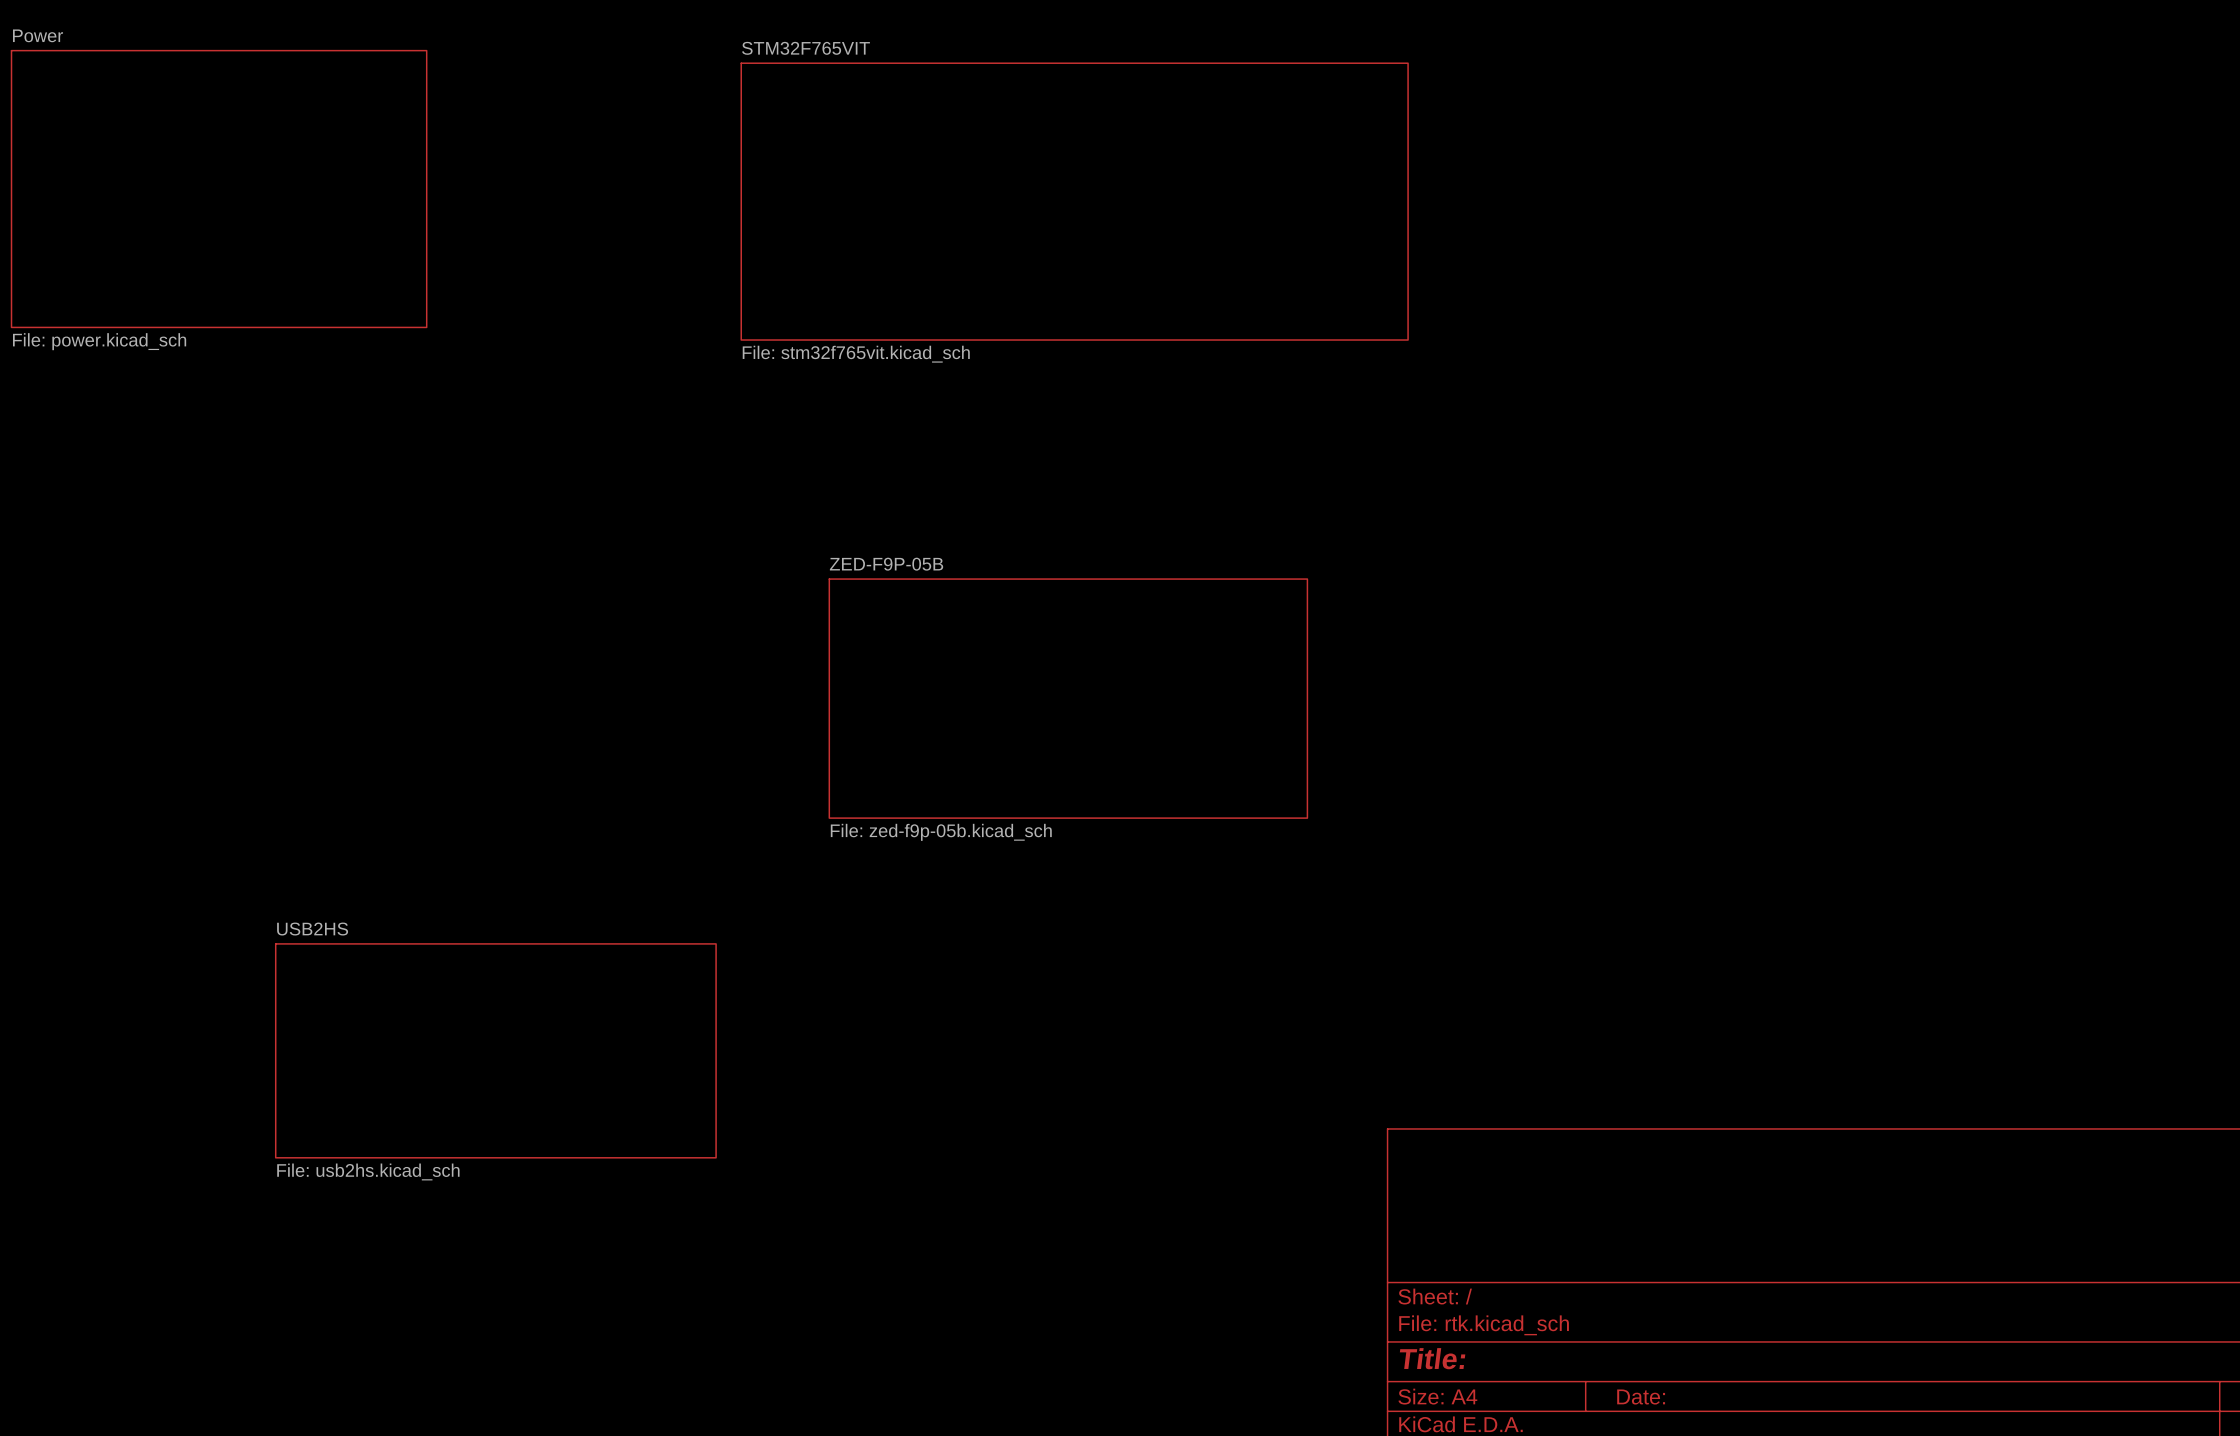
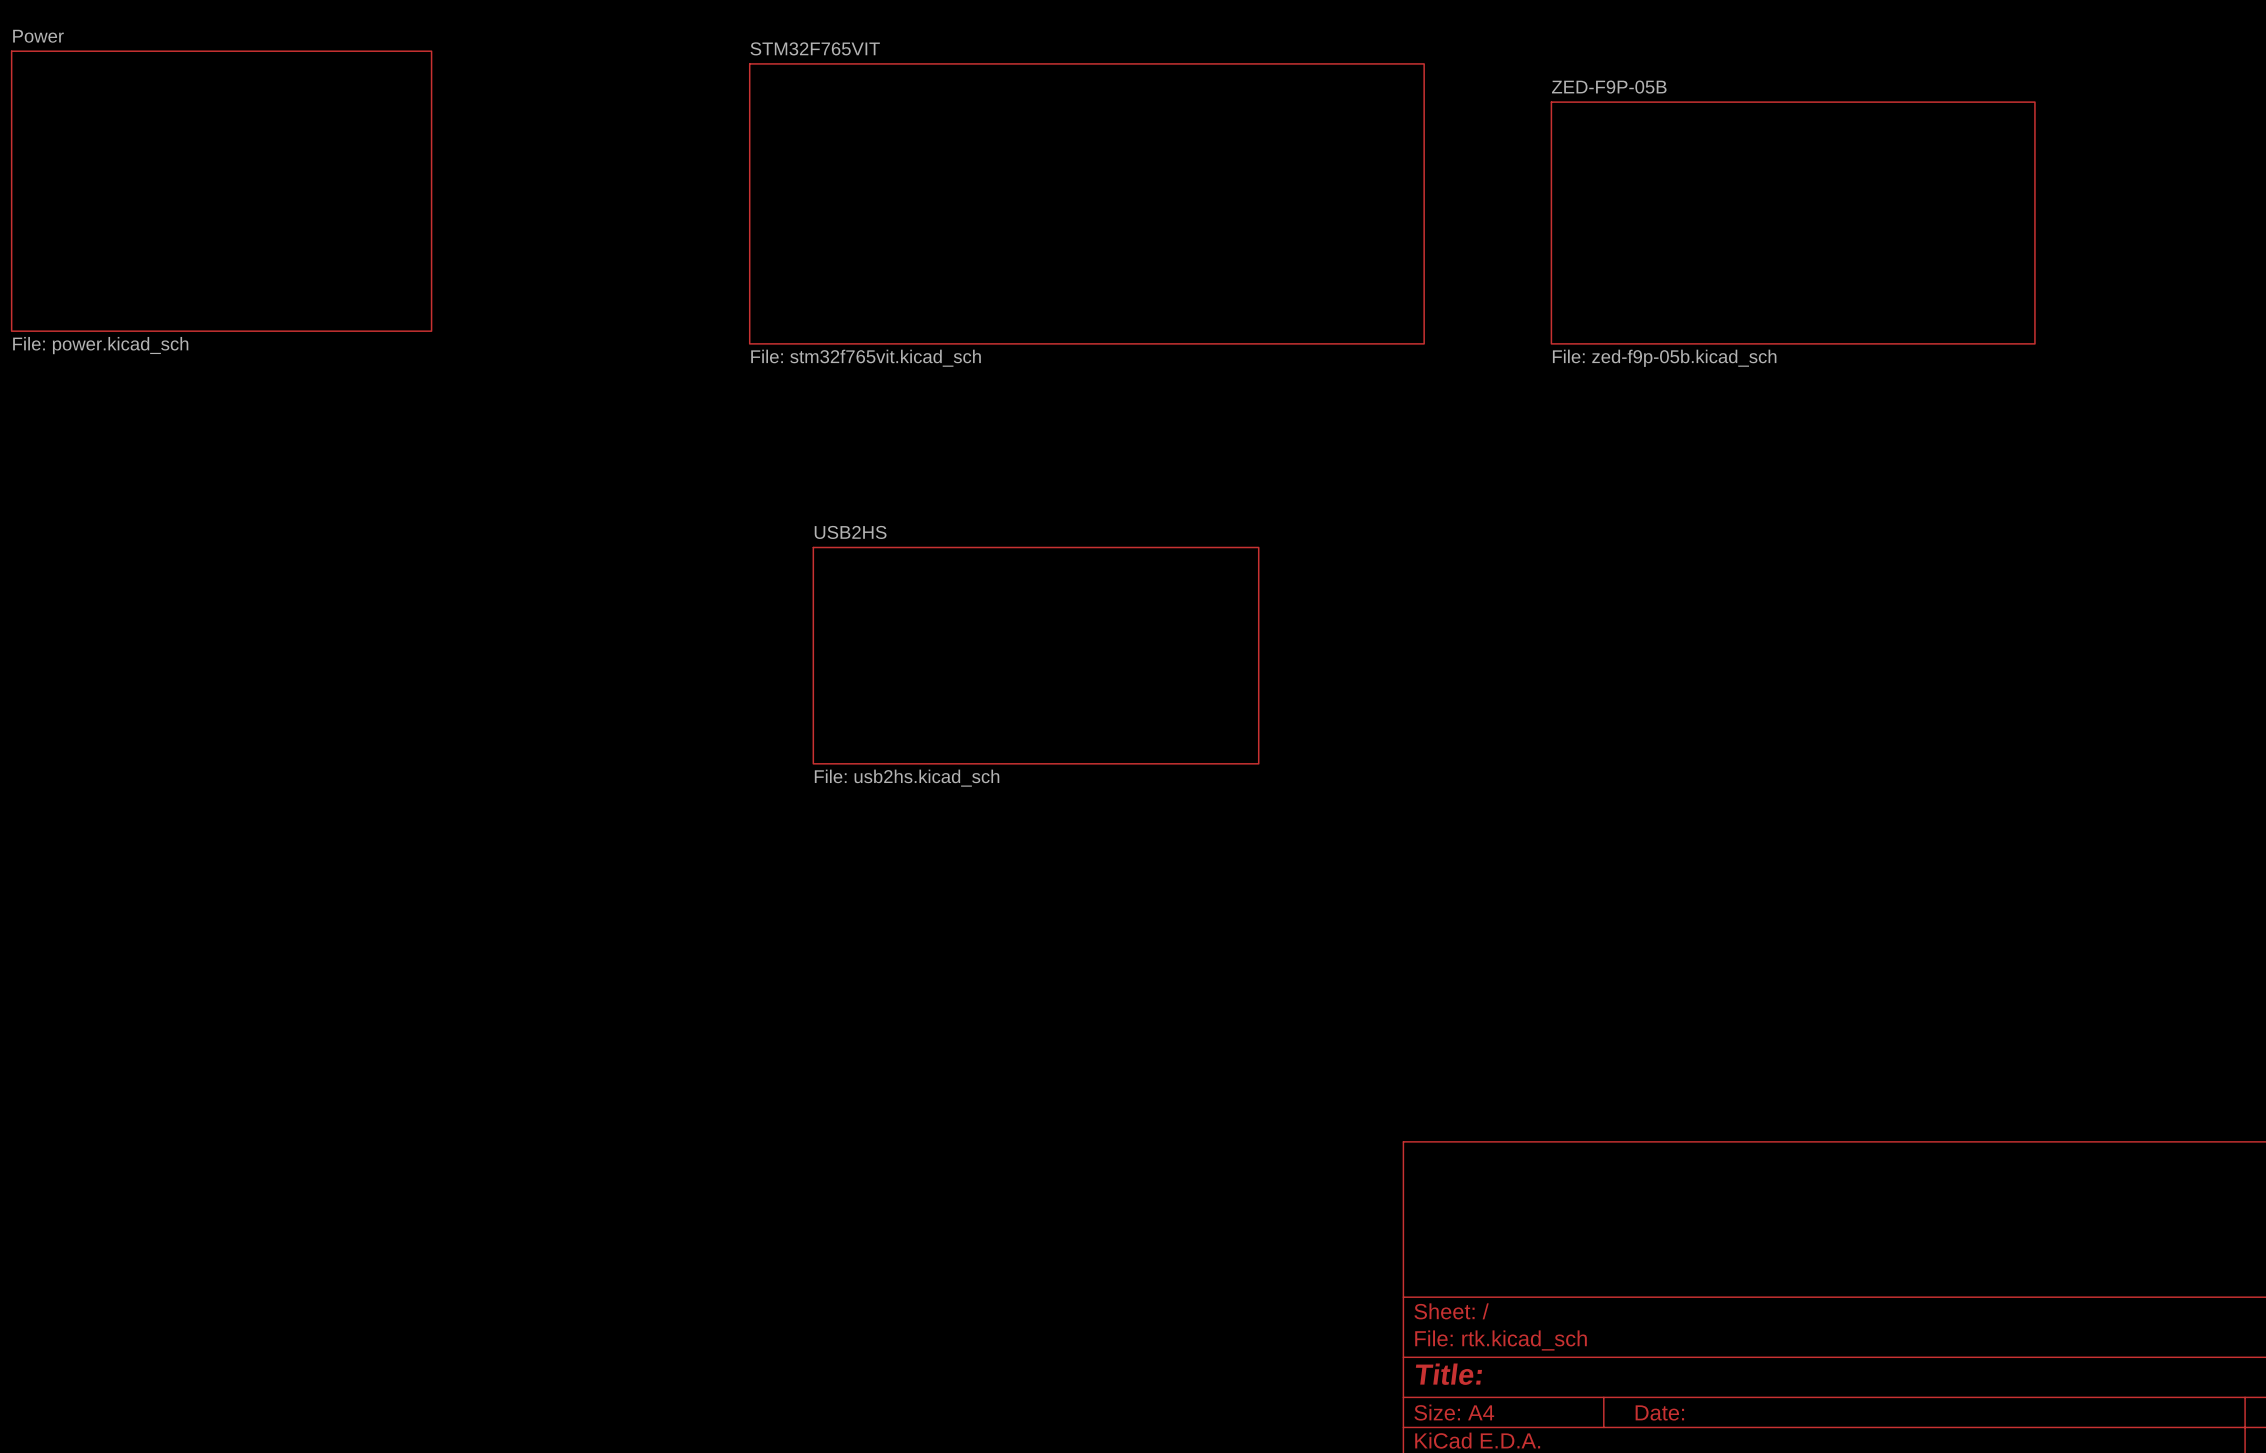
sheet ZED-F9P-05B position: (1068, 698) -> (1793, 223)
sheet USB2HS position: (495, 1050) -> (1036, 655)

